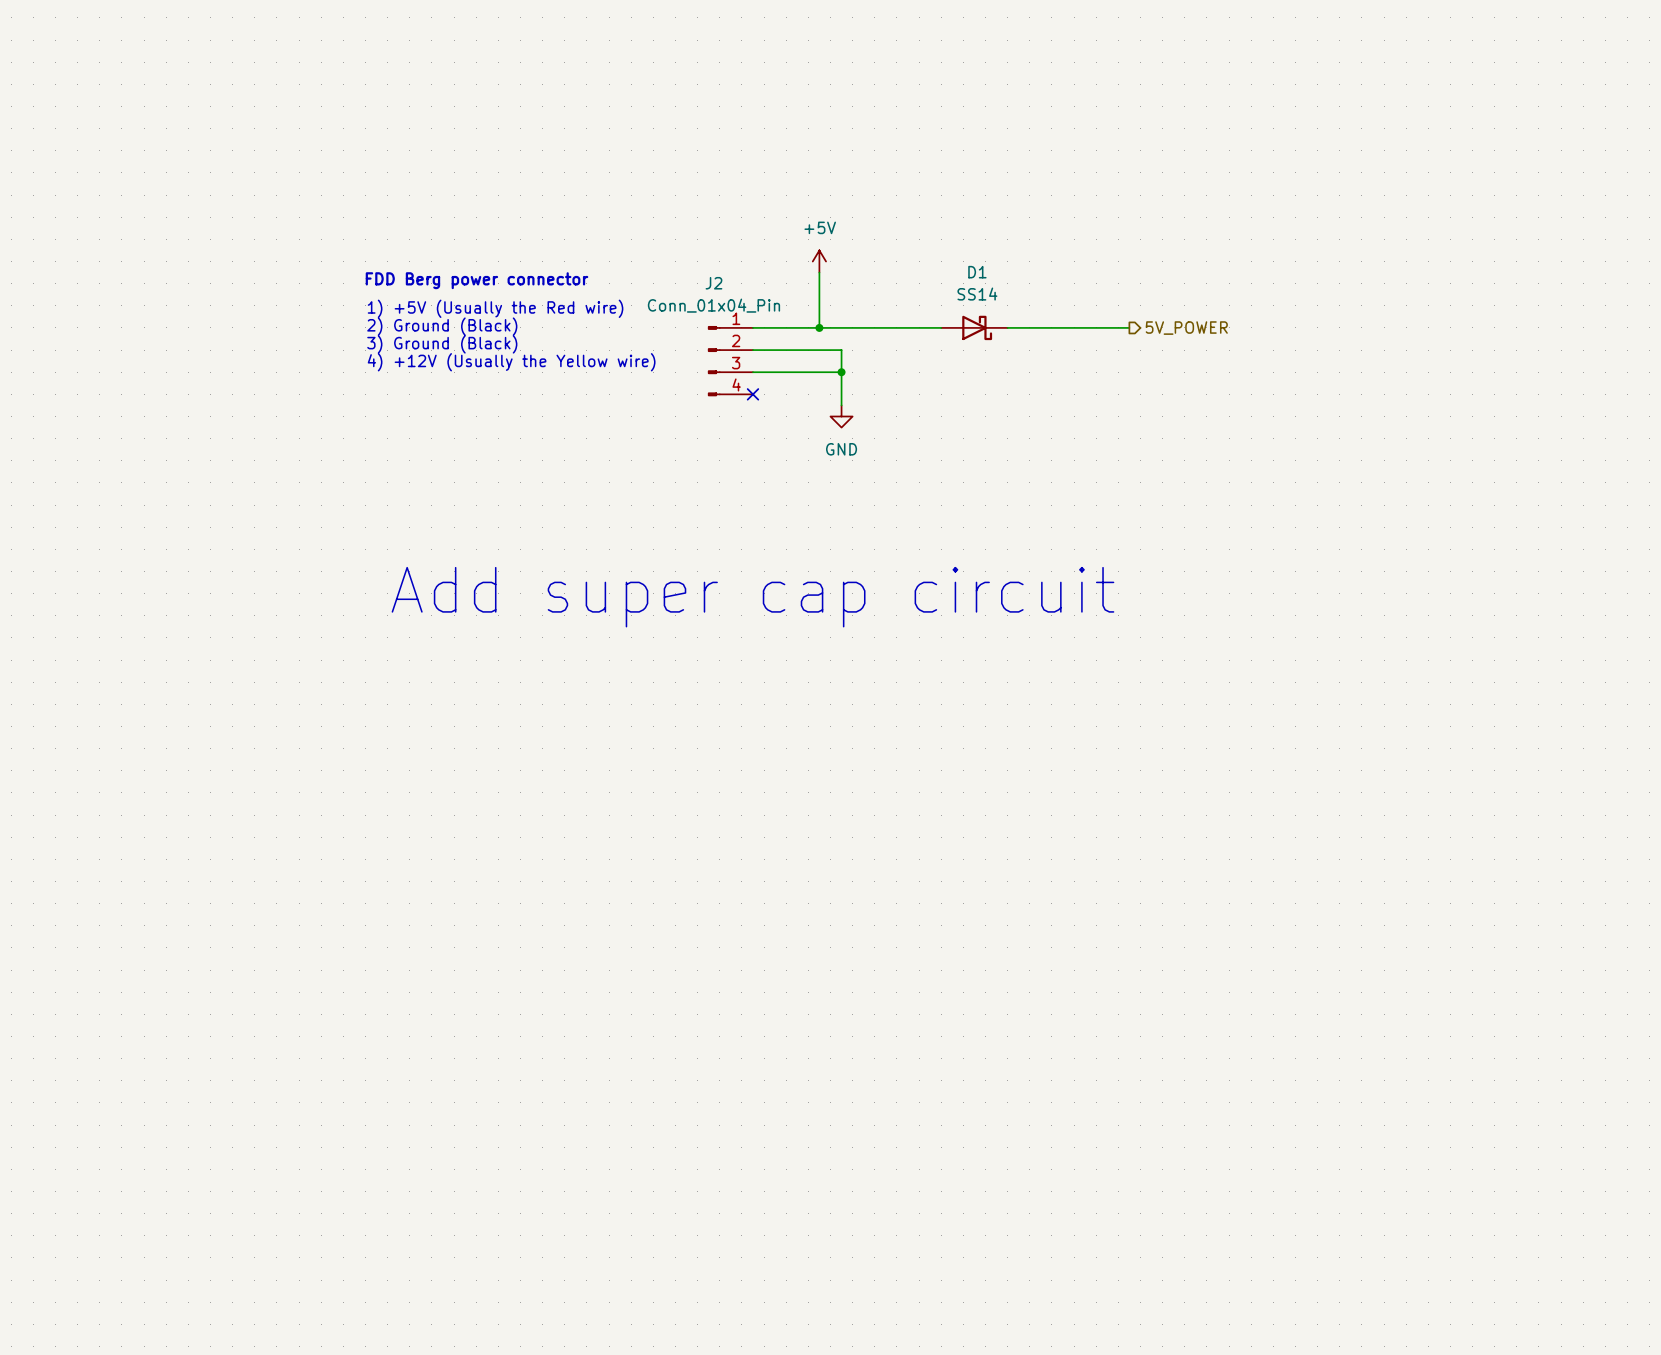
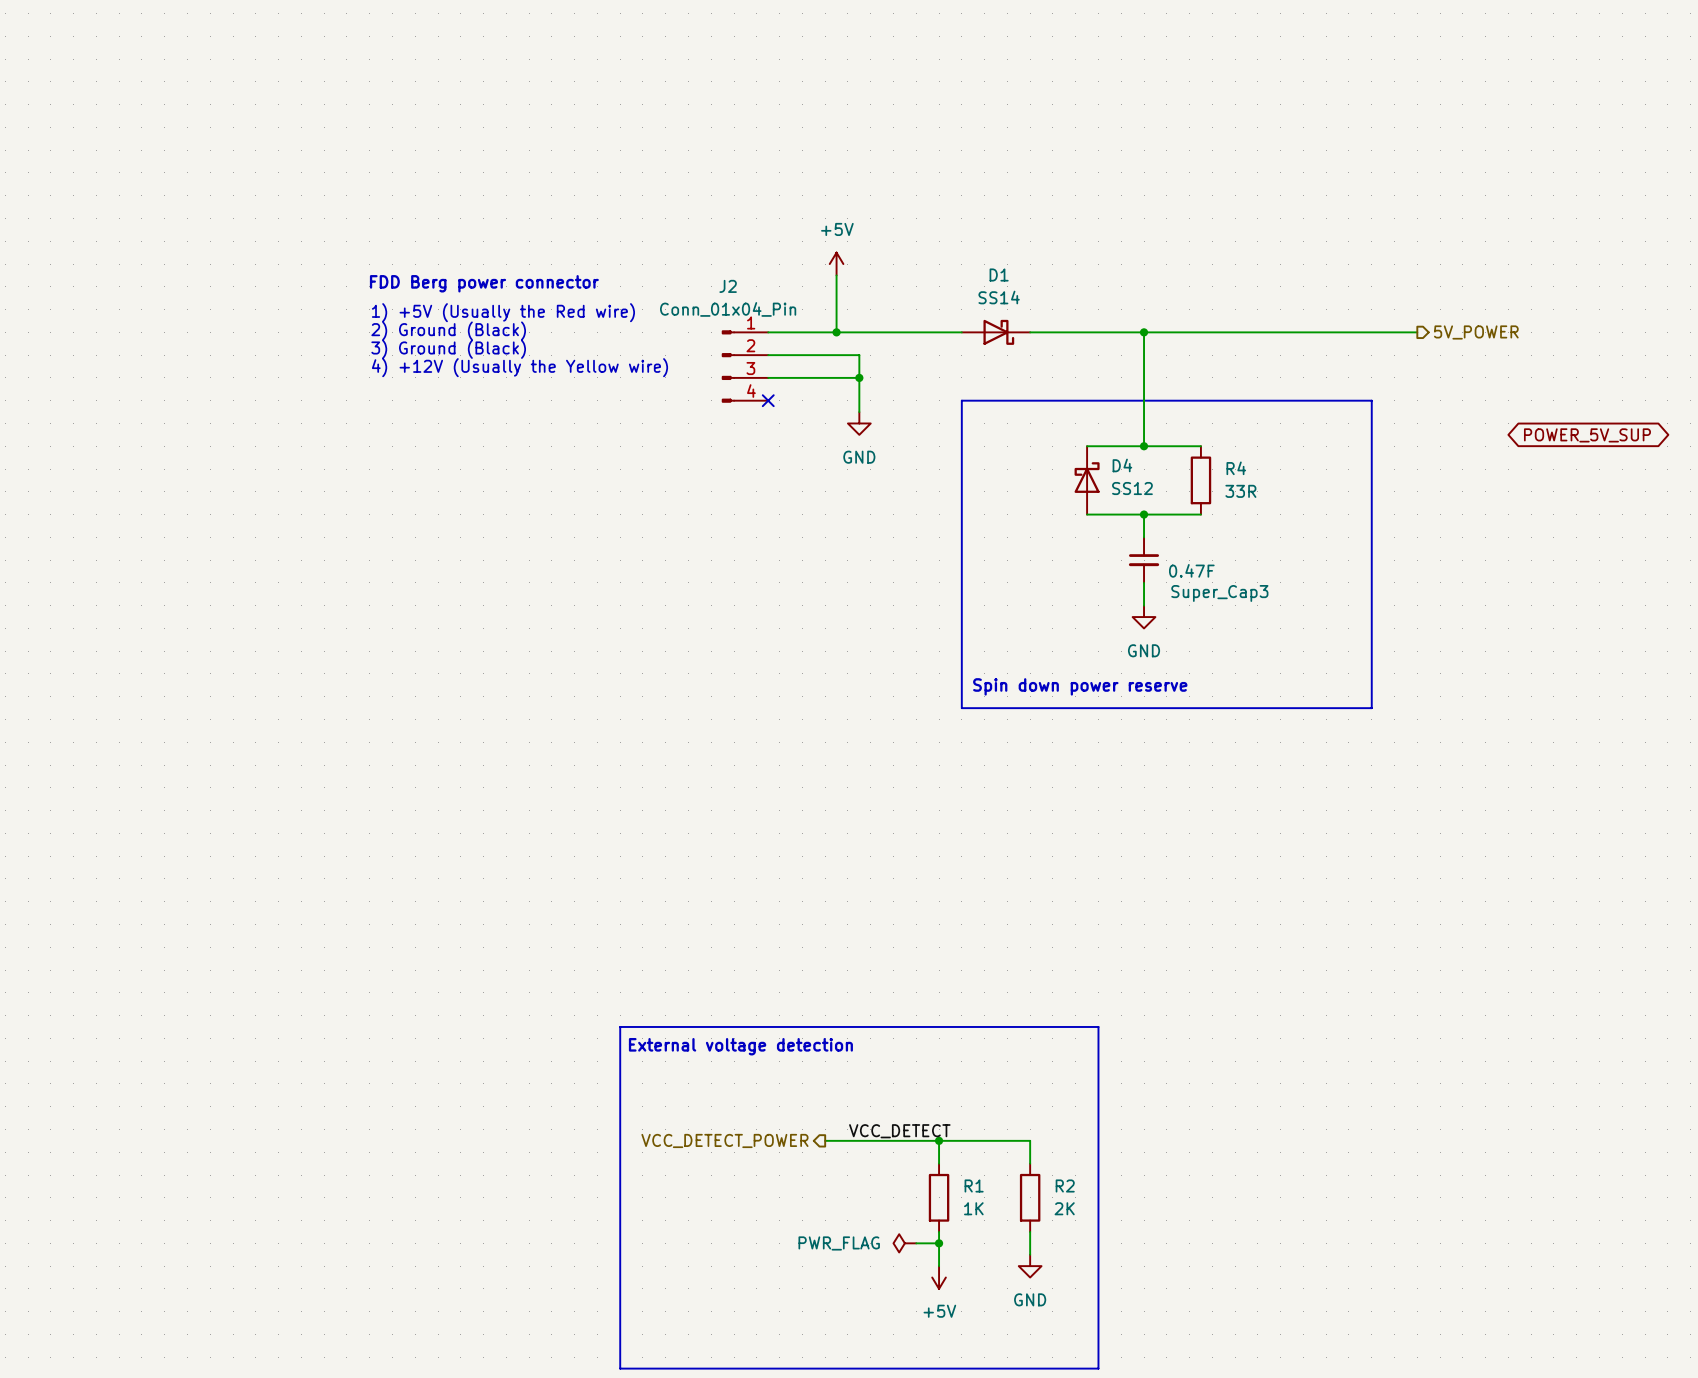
wire: none -> (1144, 332) (1144, 446)
junction: none -> (1144, 332)
wire: none -> (1155, 332) (1417, 332)
hierarchical label: 5V_POWER (1186, 328) -> none
hierarchical label: none -> 5V_POWER (1476, 332)
line: none -> (961, 400) (1371, 400) (1371, 708) (961, 708) (961, 400)
global label: none -> POWER_5V_SUP (1587, 435)
wire: none -> (1087, 446) (1200, 446)
junction: none -> (1144, 446)
D4: none -> SS12 (1087, 480)
R4: none -> 33R (1200, 480)
wire: none -> (1087, 514) (1200, 514)
wire: none -> (1144, 514) (1144, 537)
junction: none -> (1144, 514)
Super_Cap3: none -> 0.47F (1144, 560)
wire: none -> (1144, 582) (1144, 605)
text: Add super cap circuit (752, 597) -> none
power symbol: none -> GND (1144, 617)
text: none -> Spin down power reserve (1080, 686)
line: none -> (620, 1026) (1098, 1026) (1098, 1368) (620, 1368) (620, 1026)
text: none -> External voltage detection (740, 1046)
label: none -> VCC_DETECT (899, 1131)
wire: none -> (825, 1140) (1030, 1140) (1030, 1163)
wire: none -> (939, 1140) (939, 1163)
junction: none -> (939, 1140)
hierarchical label: none -> VCC_DETECT_POWER (724, 1140)
R1: none -> 1K (939, 1197)
R2: none -> 2K (1030, 1197)
wire: none -> (939, 1231) (939, 1266)
wire: none -> (1030, 1231) (1030, 1254)
power symbol: none -> PWR_FLAG (904, 1243)
wire: none -> (916, 1243) (939, 1243)
junction: none -> (939, 1243)
power symbol: none -> GND (1030, 1266)
power symbol: none -> +5V (939, 1277)

